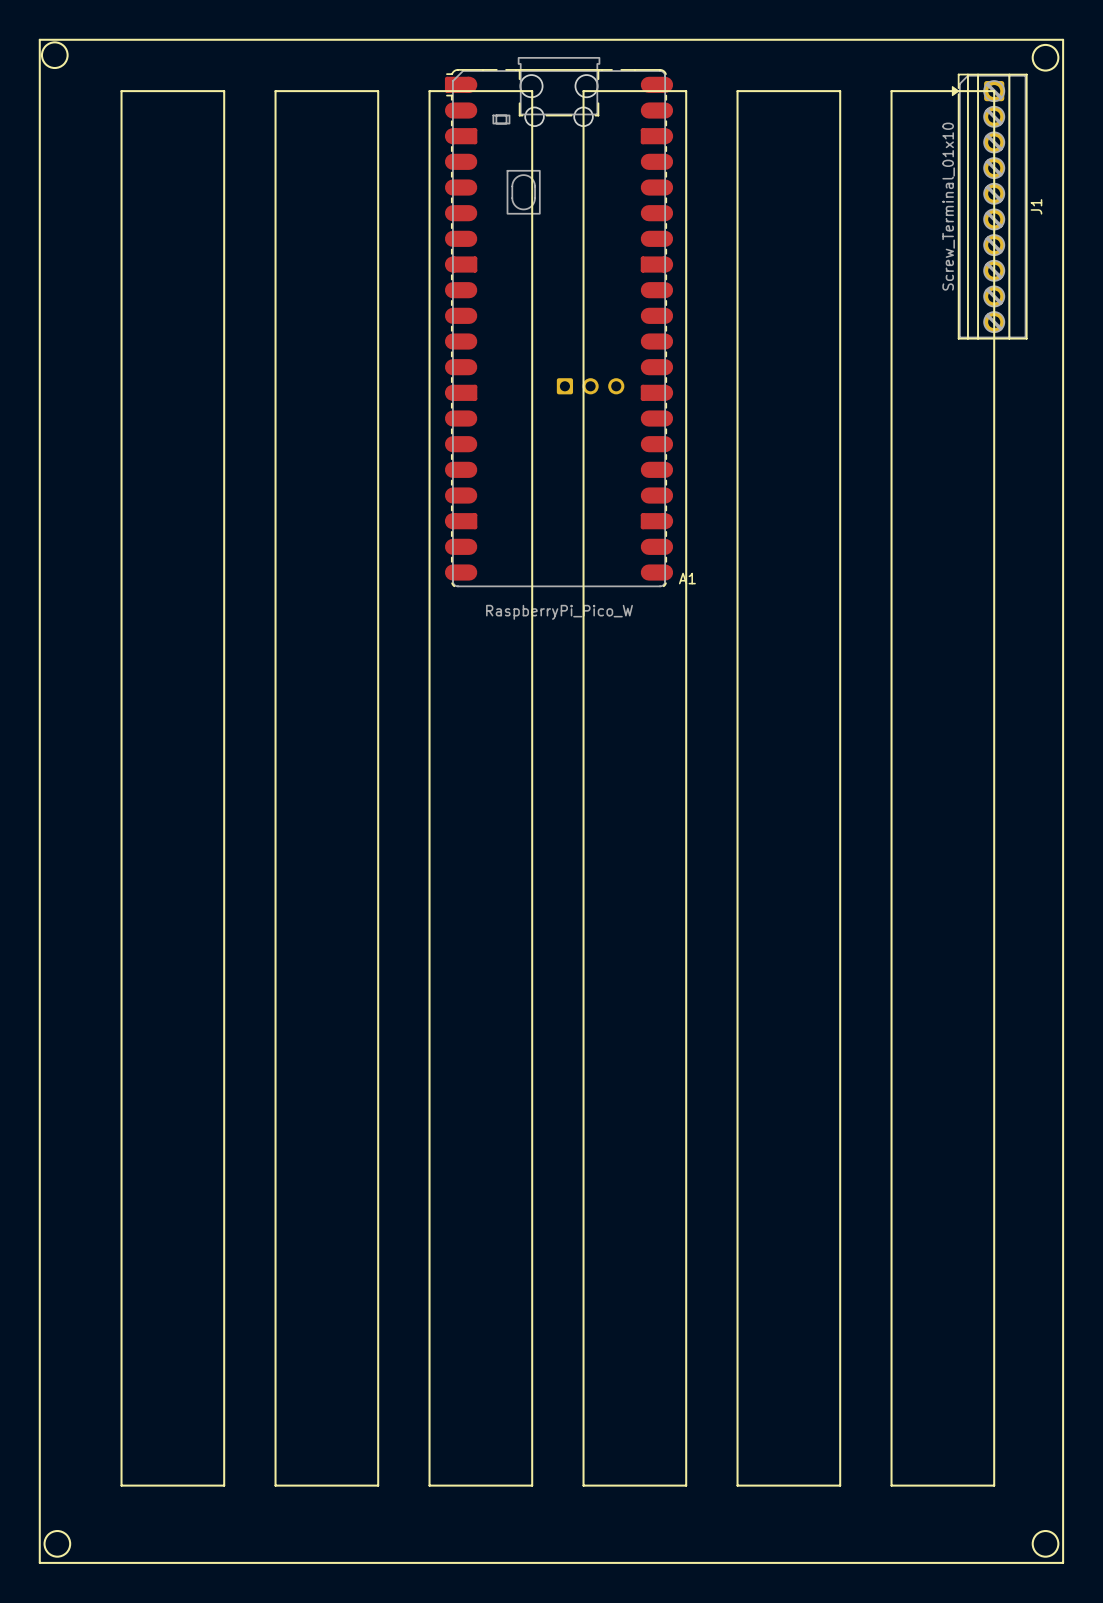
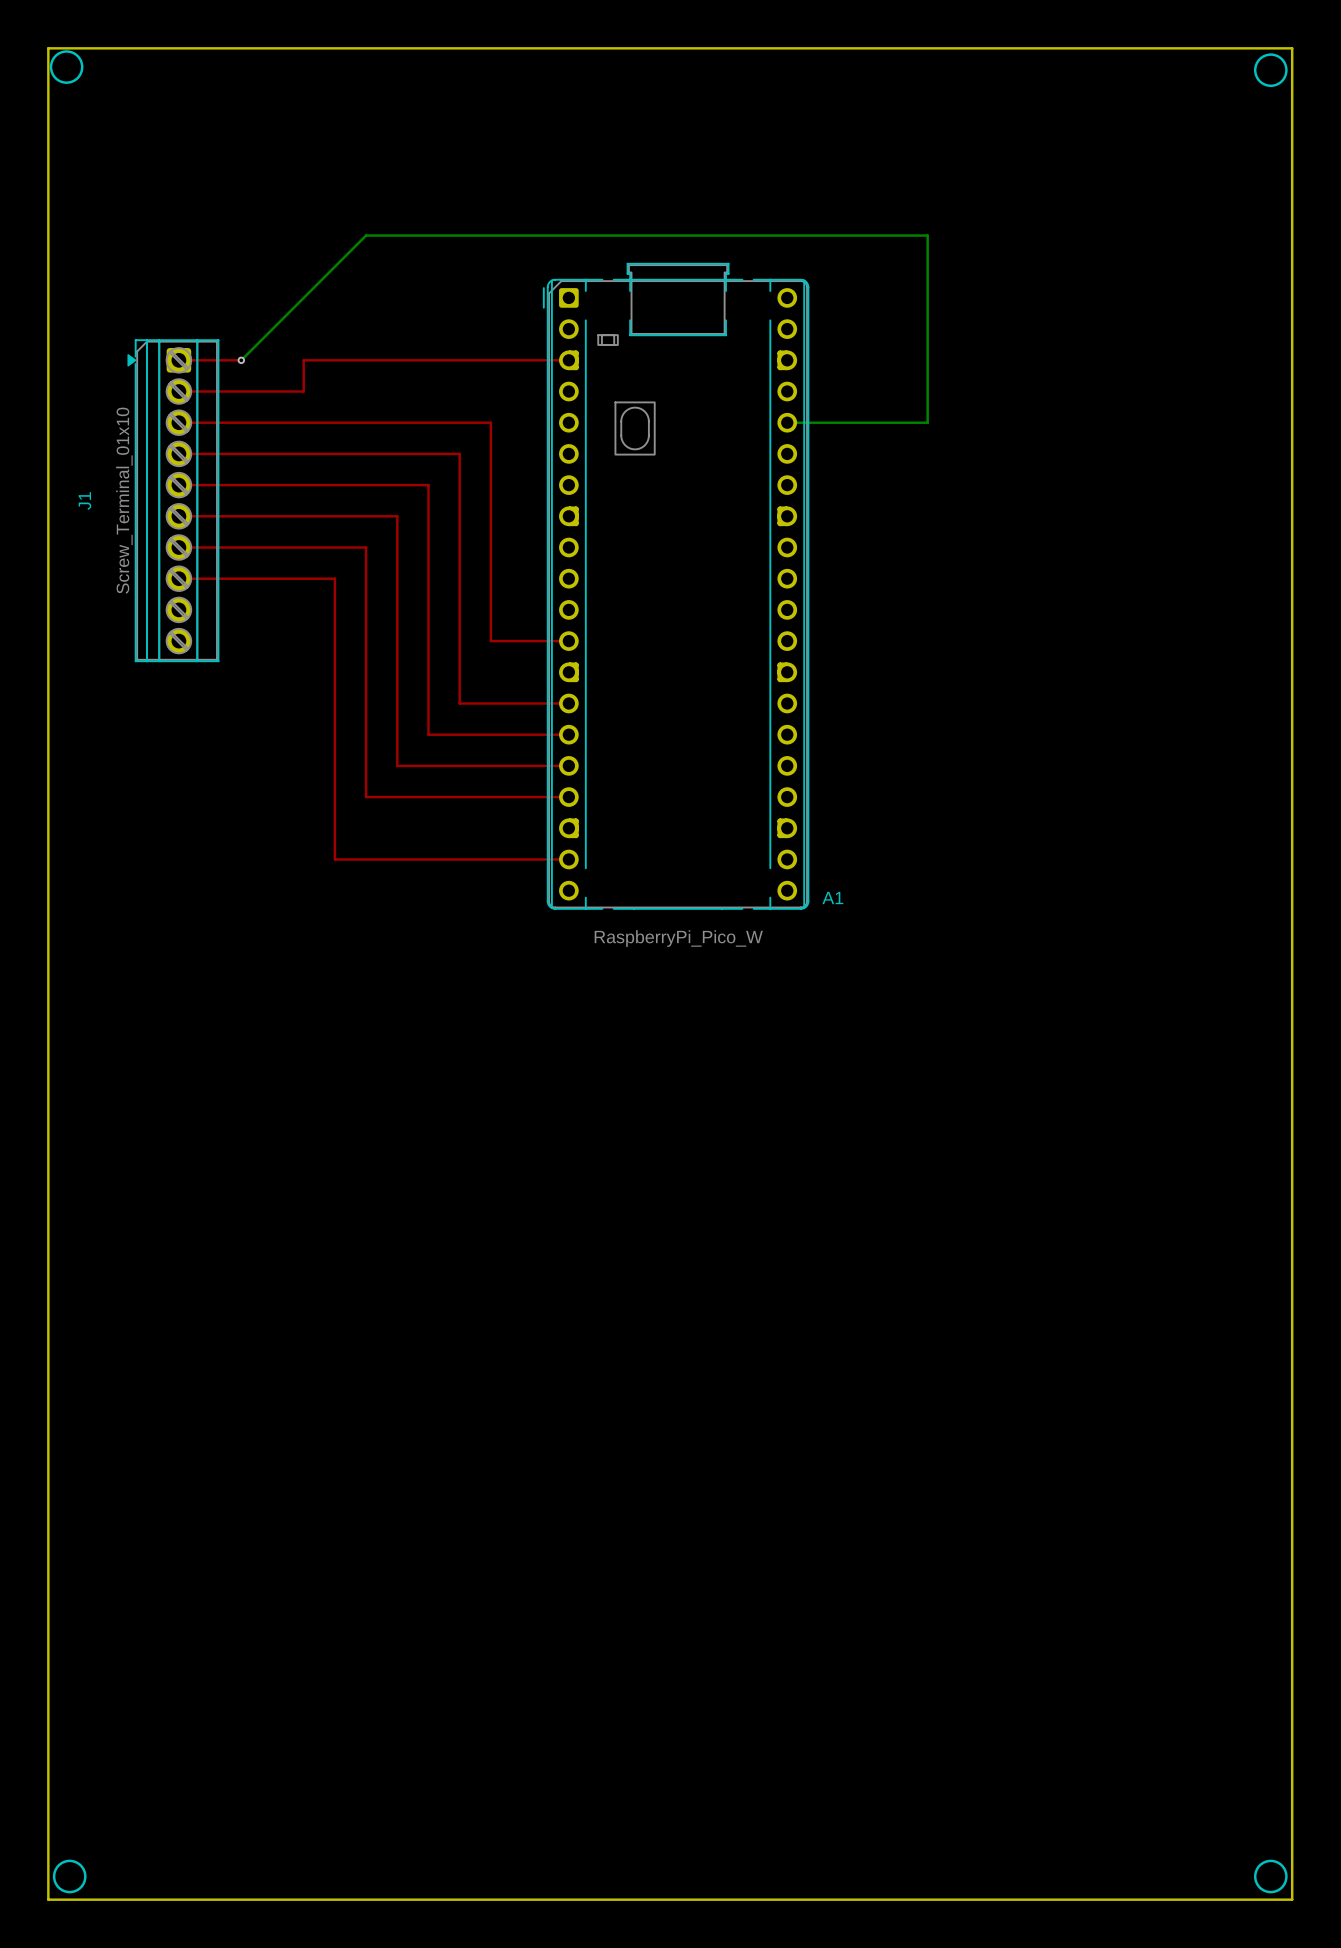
line: (39, 39) (1063, 39) (1063, 1562) (39, 1562) (39, 39) -> none
board edge: none -> (48, 48) (1292, 48) (1292, 1899) (48, 1899) (48, 48)
A1 footprint: [444, 57, 674, 587] -> [543, 263, 810, 910]
line: (121, 91) (224, 91) (224, 1485) (121, 1485) (121, 91) -> none
line: (275, 91) (378, 91) (378, 1485) (275, 1485) (275, 91) -> none
line: (429, 91) (532, 91) (532, 1485) (429, 1485) (429, 91) -> none
line: (583, 91) (686, 91) (686, 1485) (583, 1485) (583, 91) -> none
line: (737, 91) (840, 91) (840, 1485) (737, 1485) (737, 91) -> none
line: (891, 91) (994, 91) (994, 1485) (891, 1485) (891, 91) -> none
J1 position: (989, 206) -> (173, 500)
J1 name position: J1 (1036, 206) -> J1 (84, 501)
top track: none -> (178, 360) (241, 360)
bottom track: none -> (241, 360) (366, 235) (927, 235) (927, 422) (787, 422)
via: none -> (241, 360)
top track: none -> (568, 360) (303, 360) (303, 391) (178, 391)
top track: none -> (178, 422) (490, 422) (490, 641) (559, 641)
top track: none -> (178, 453) (459, 453) (459, 703) (559, 703)
top track: none -> (178, 485) (428, 485) (428, 734) (559, 734)
top track: none -> (178, 516) (397, 516) (397, 765) (568, 765)
top track: none -> (178, 547) (366, 547) (366, 797) (559, 797)
top track: none -> (178, 578) (334, 578) (334, 859) (559, 859)

